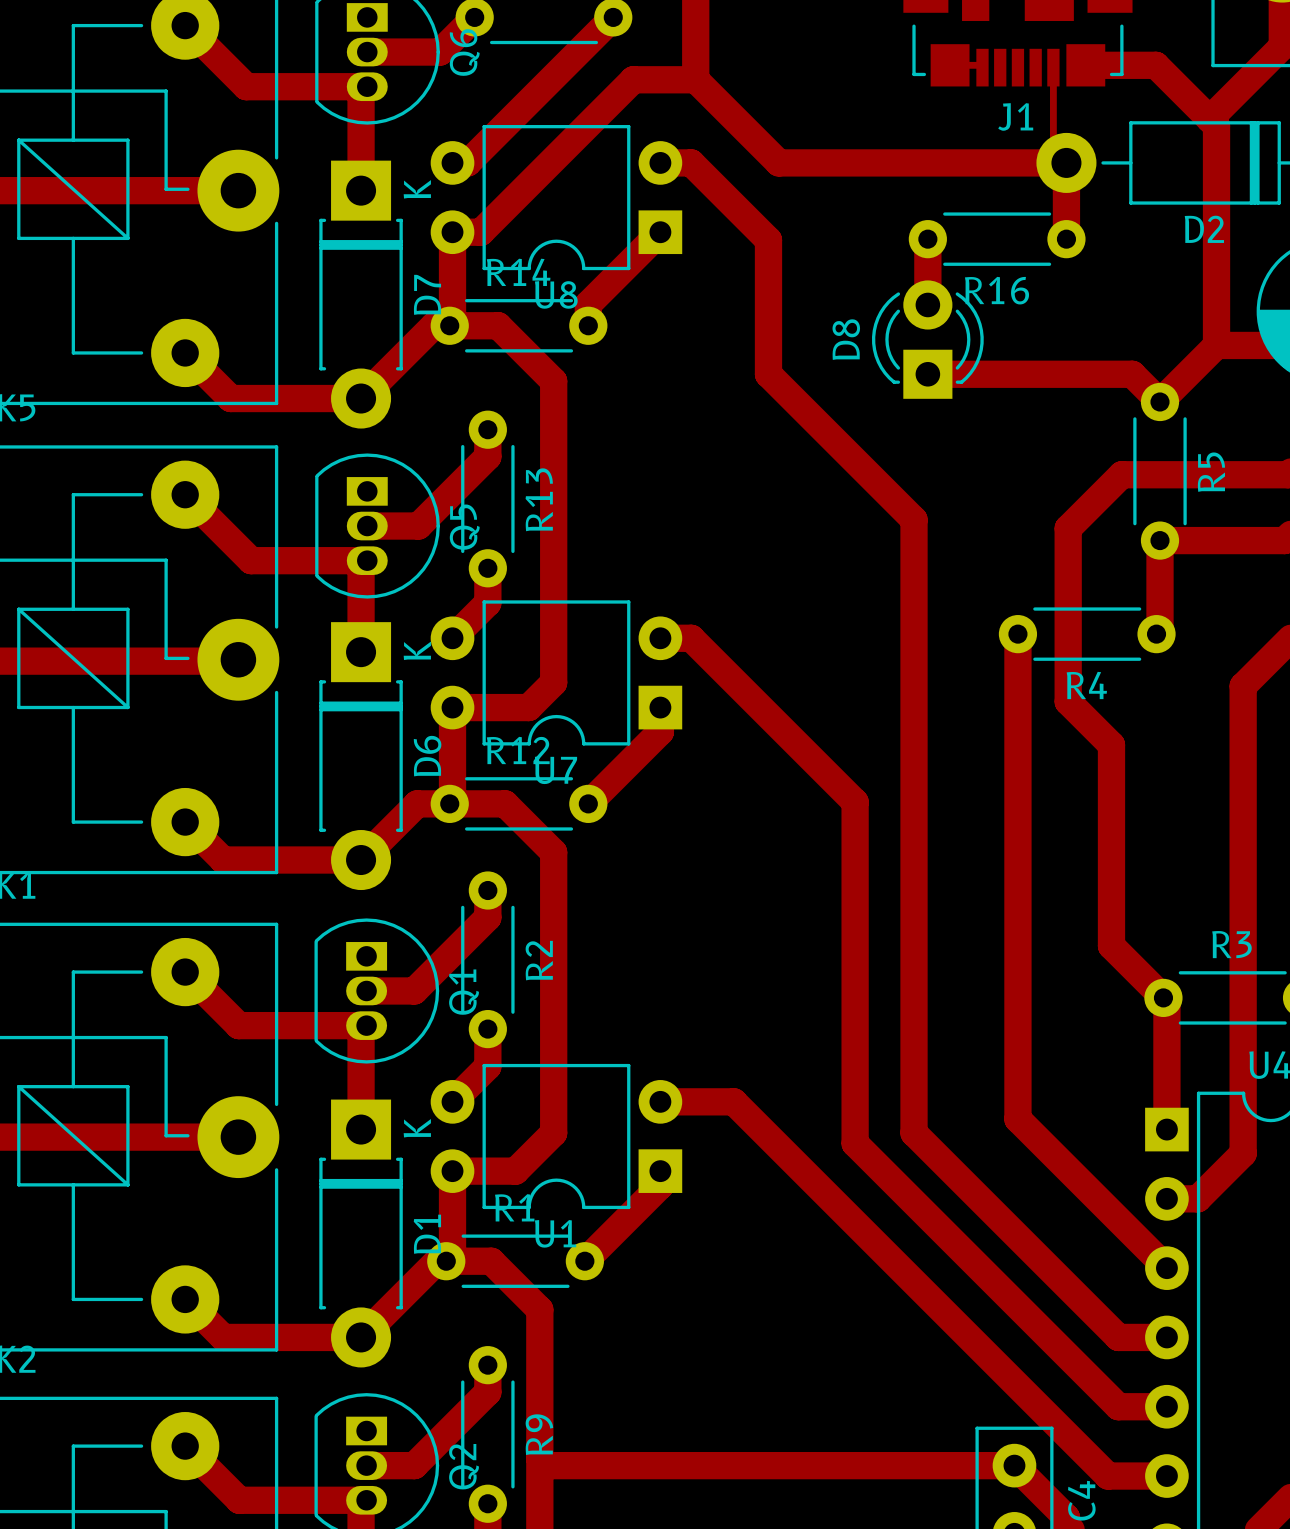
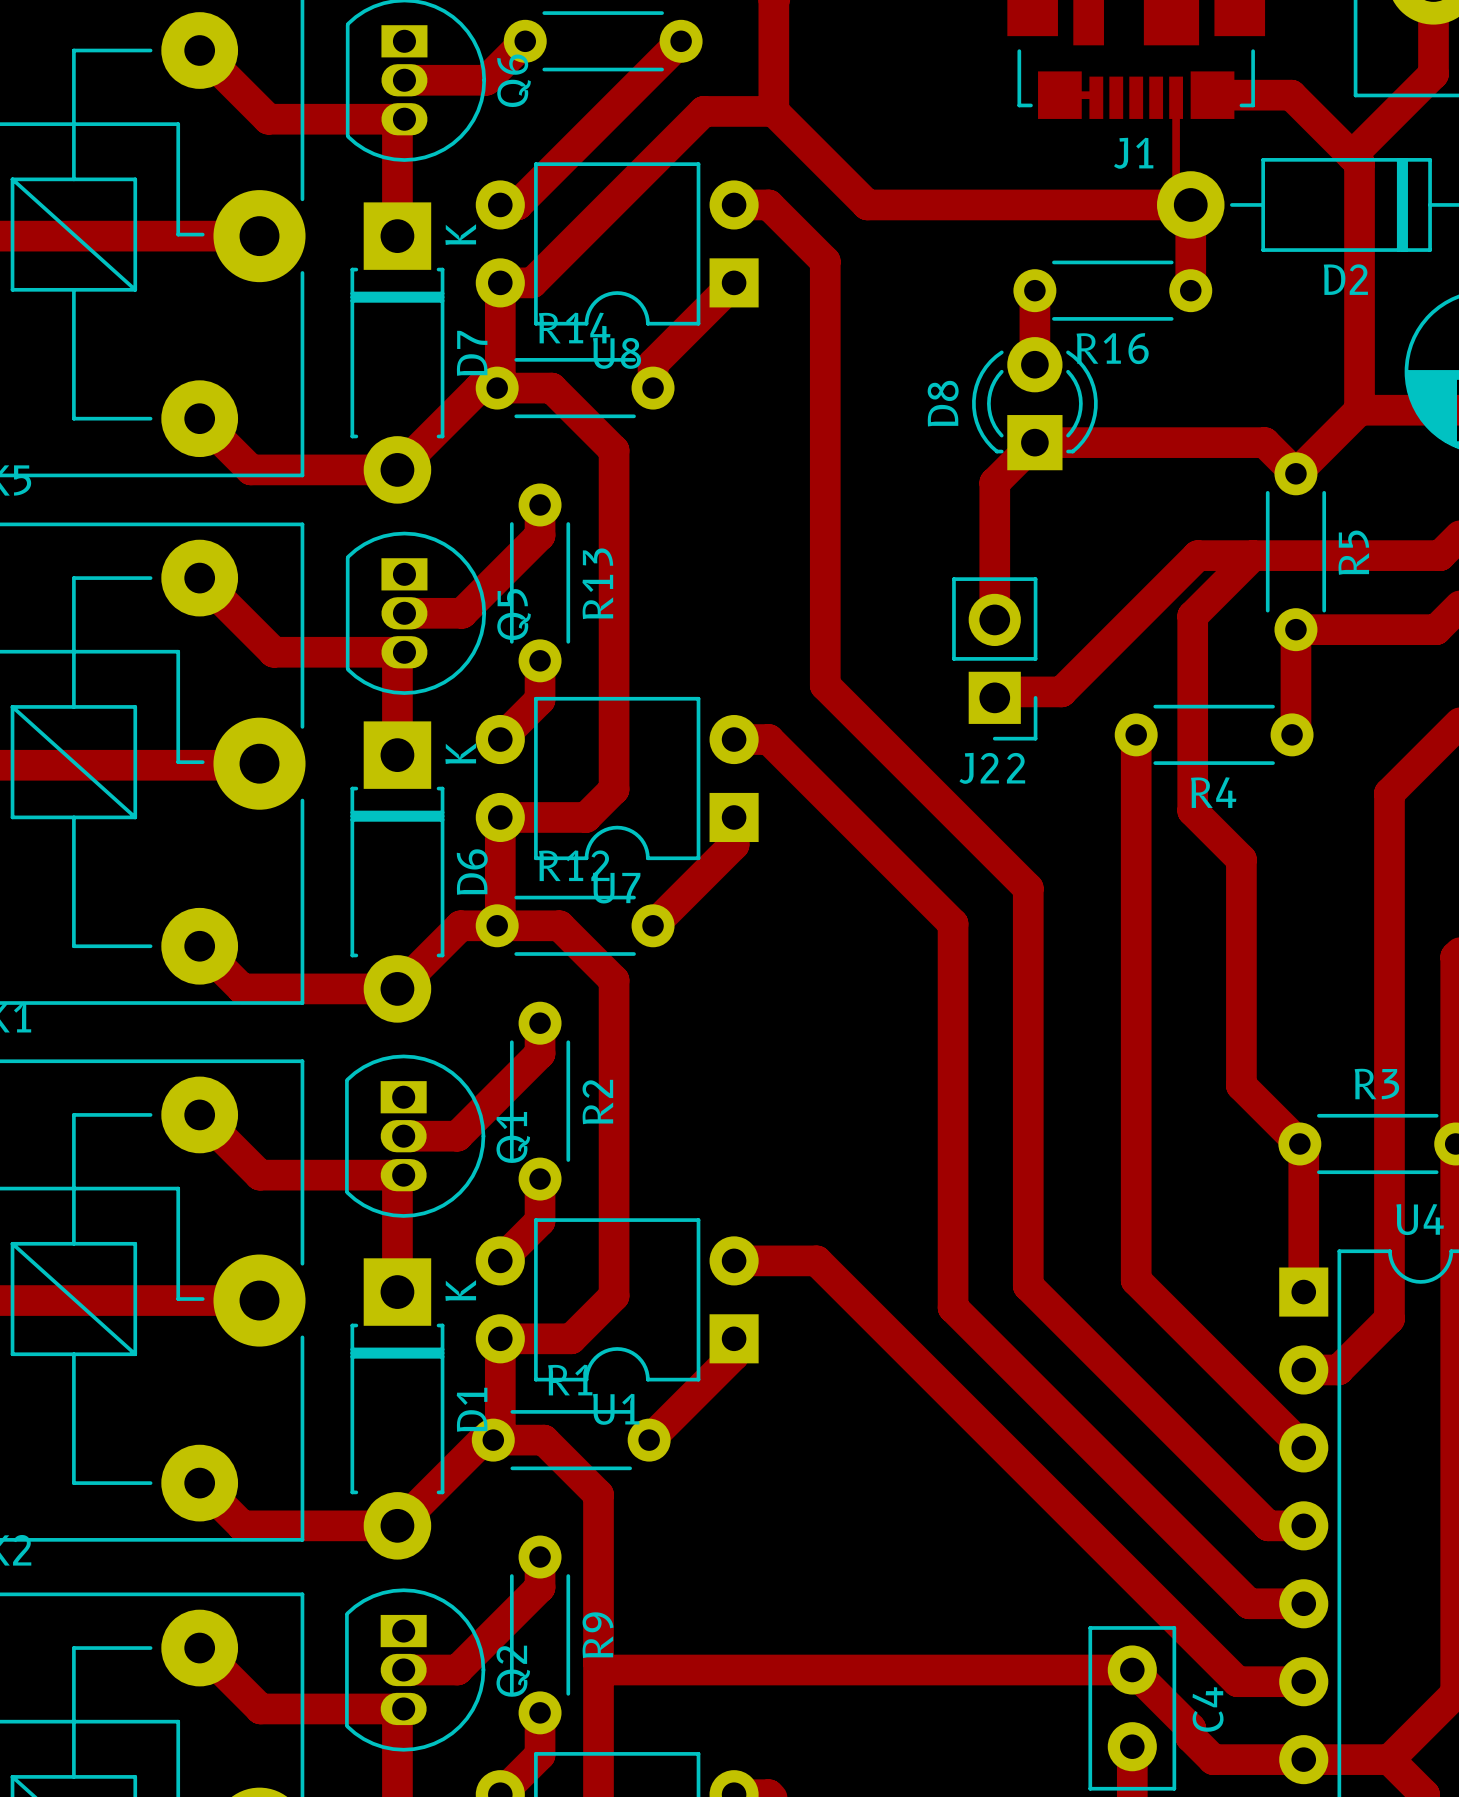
track: (741, 213) (768, 240) (768, 374) (914, 519) (914, 1133) (1118, 1337) (1135, 1337) -> (825, 261) (825, 685) (1028, 888) (1028, 1285) (1268, 1525)
track: none -> (1034, 442) (994, 482) (994, 619)
track: none -> (1253, 555) (1197, 555) (1061, 691) (1000, 691) (994, 697)
J22: none -> (994, 658)

